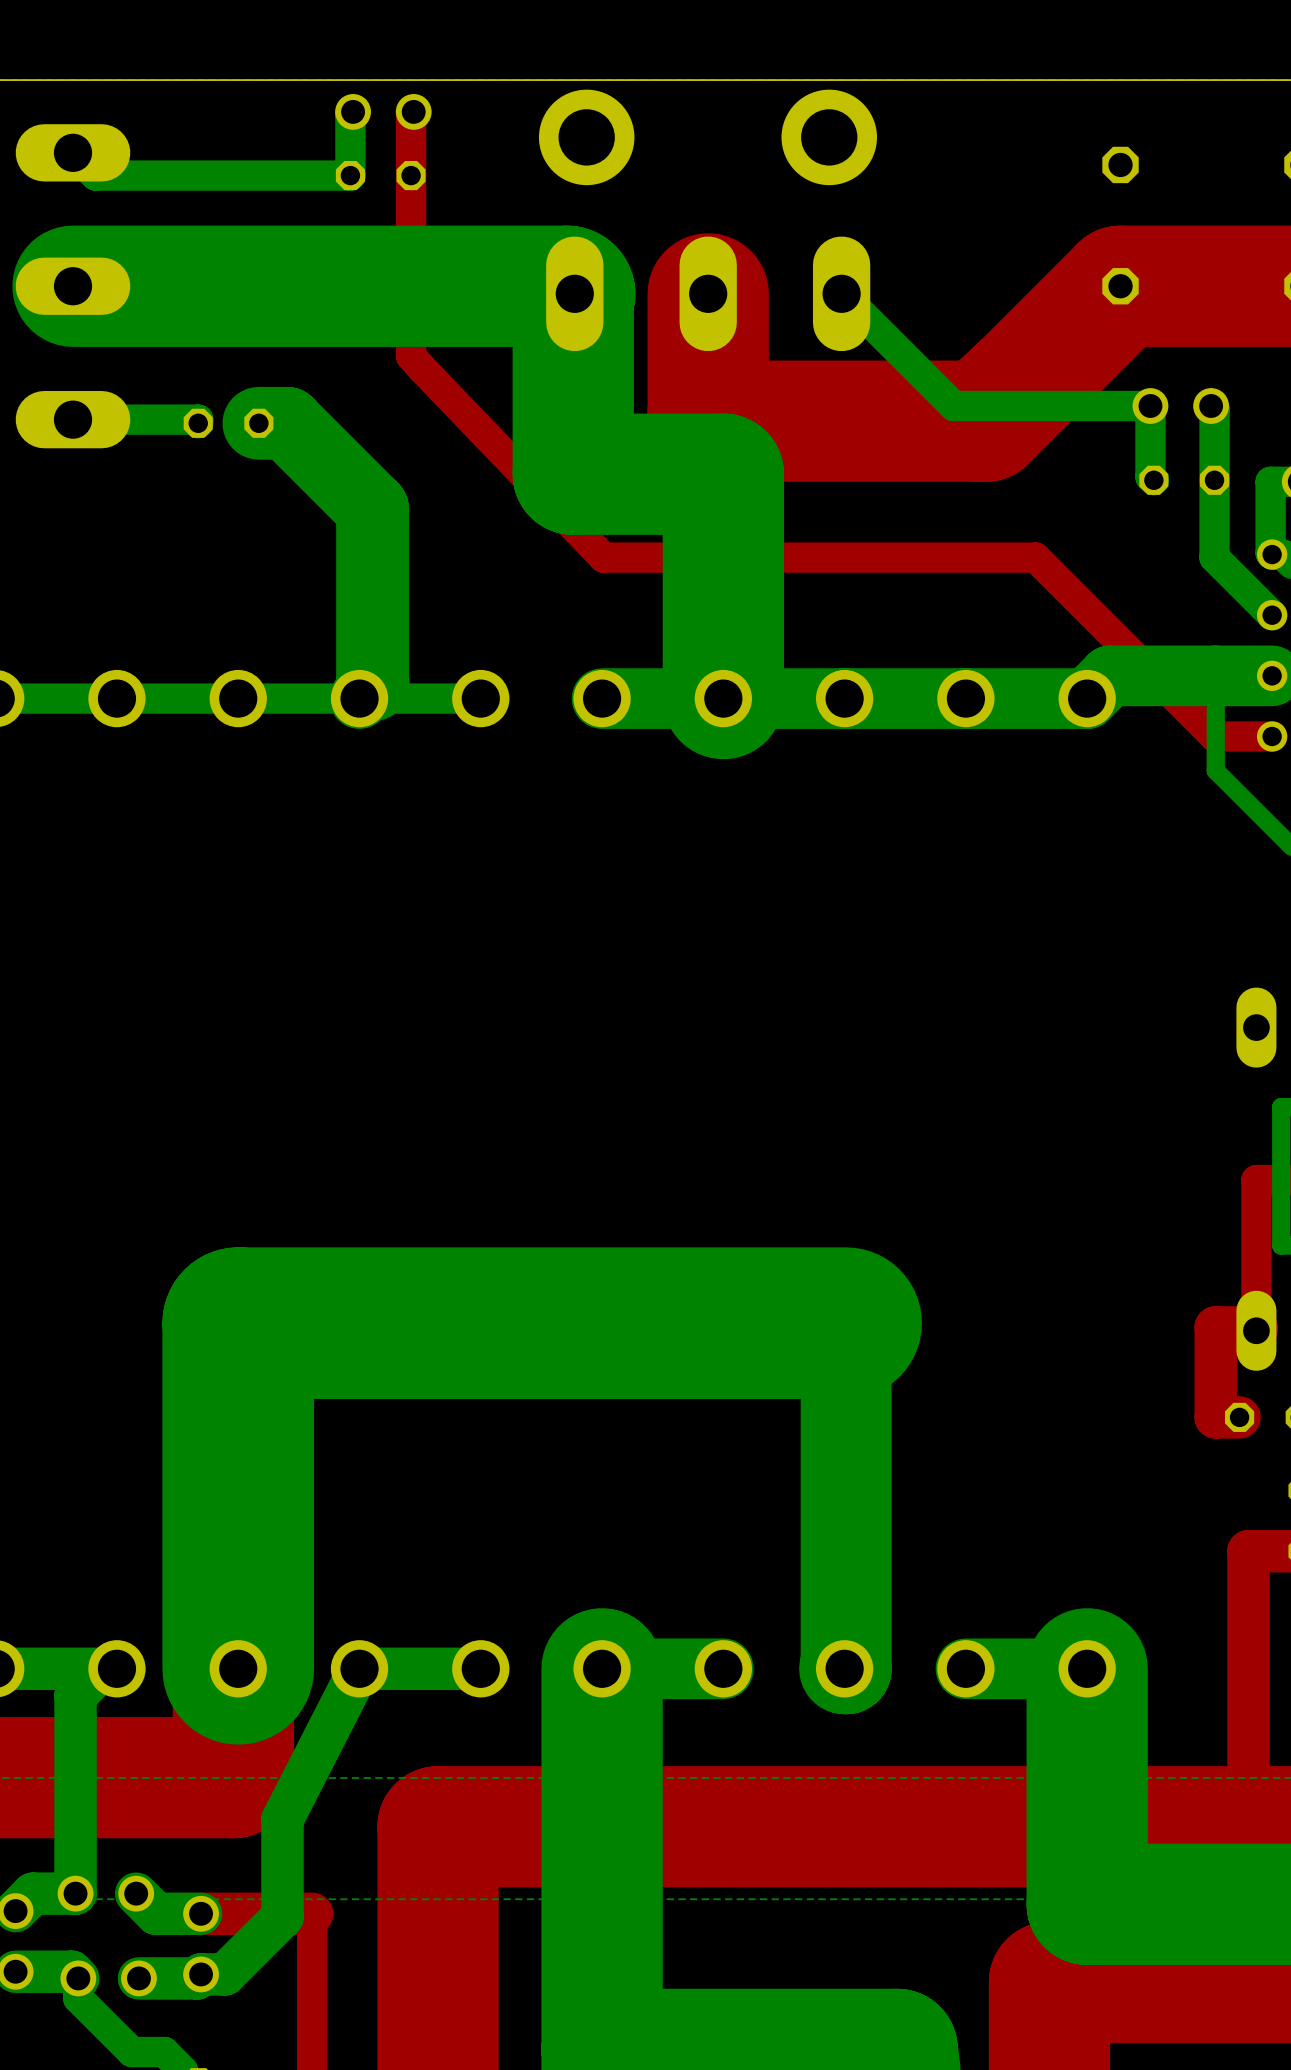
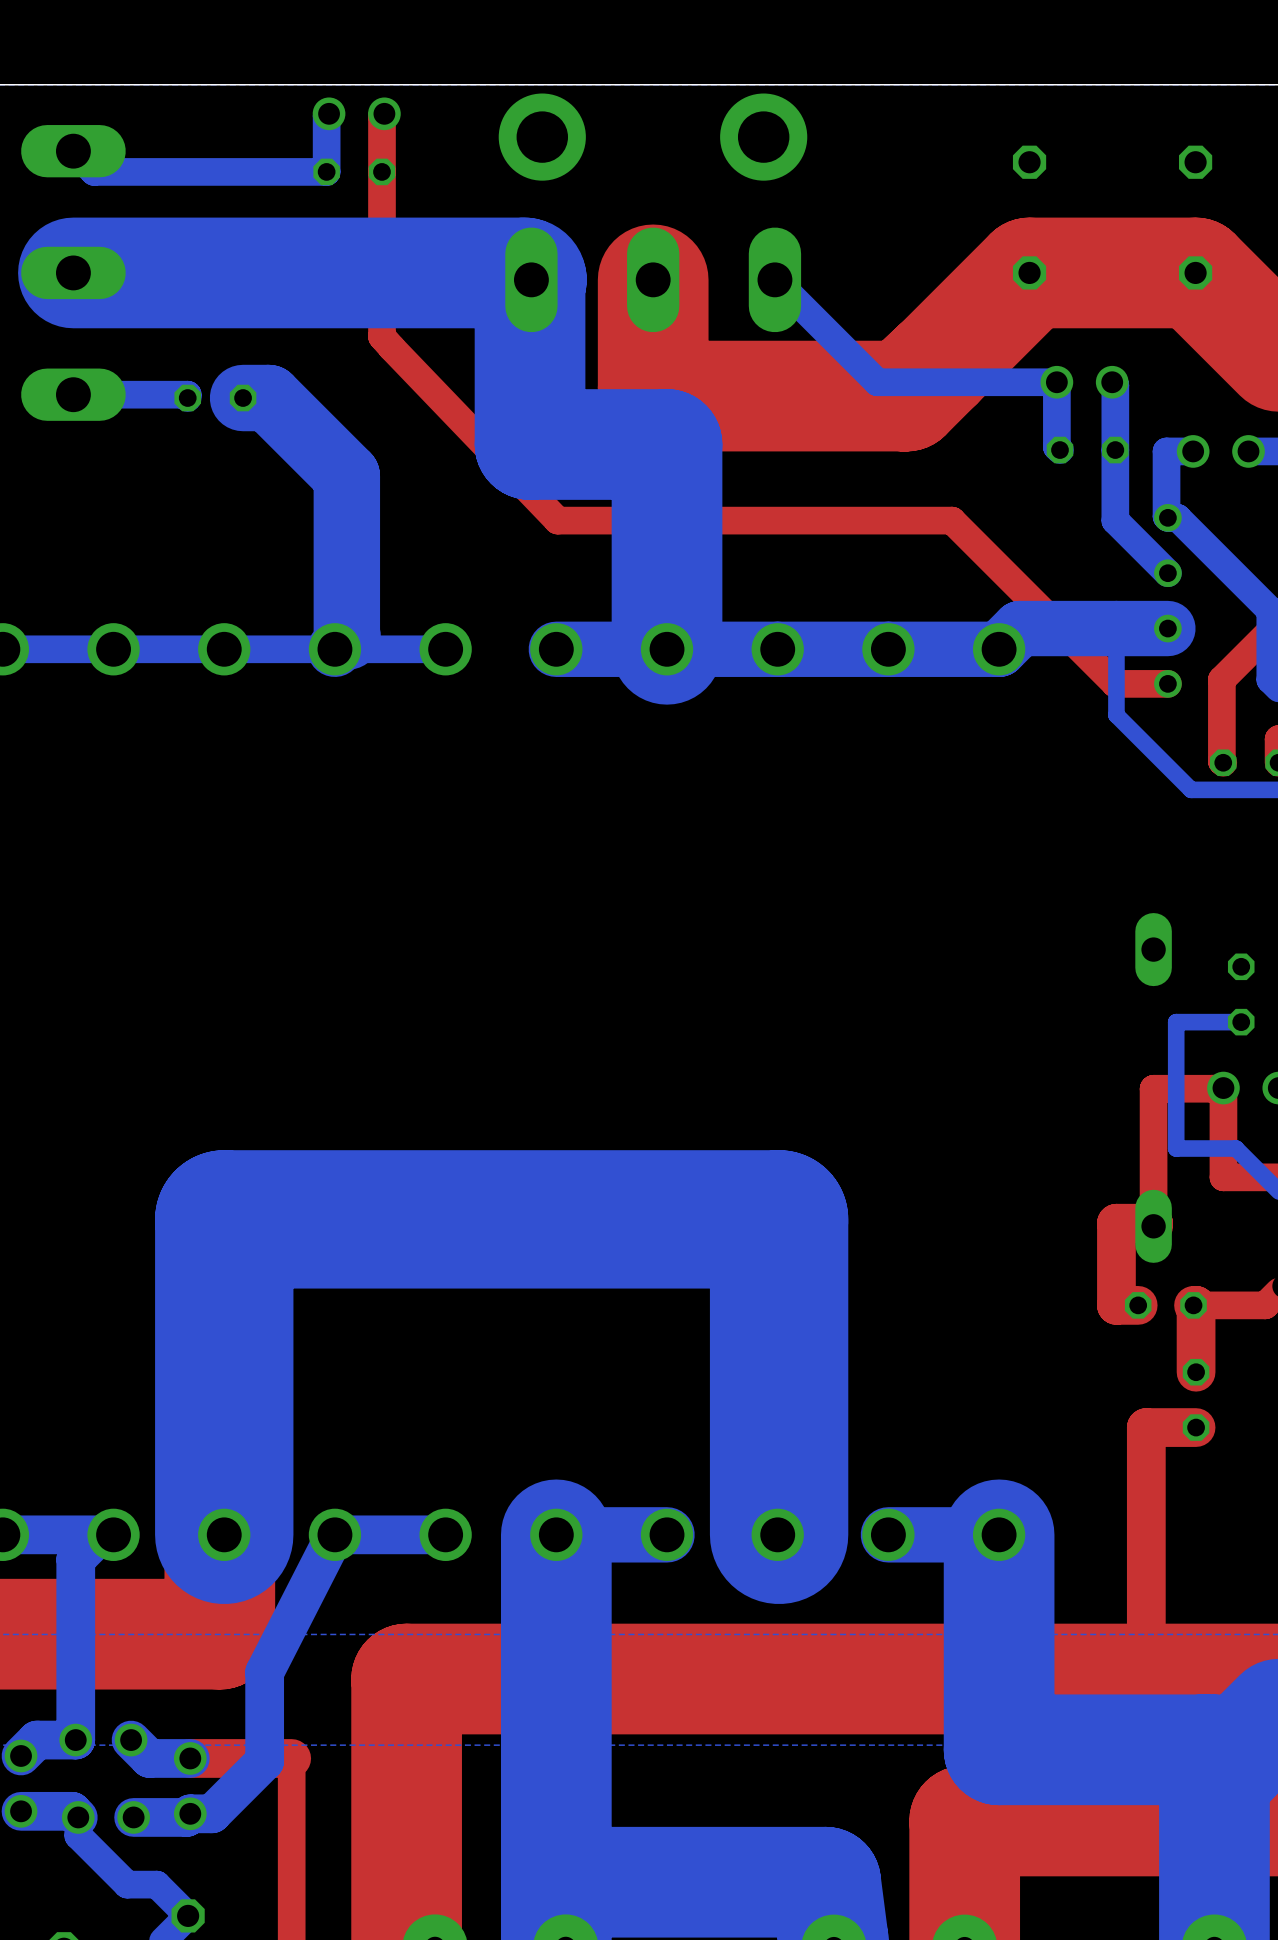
bottom track width: thin (846, 1323) (846, 1668) (844, 1668) -> thick (779, 1219) (777, 1534)

